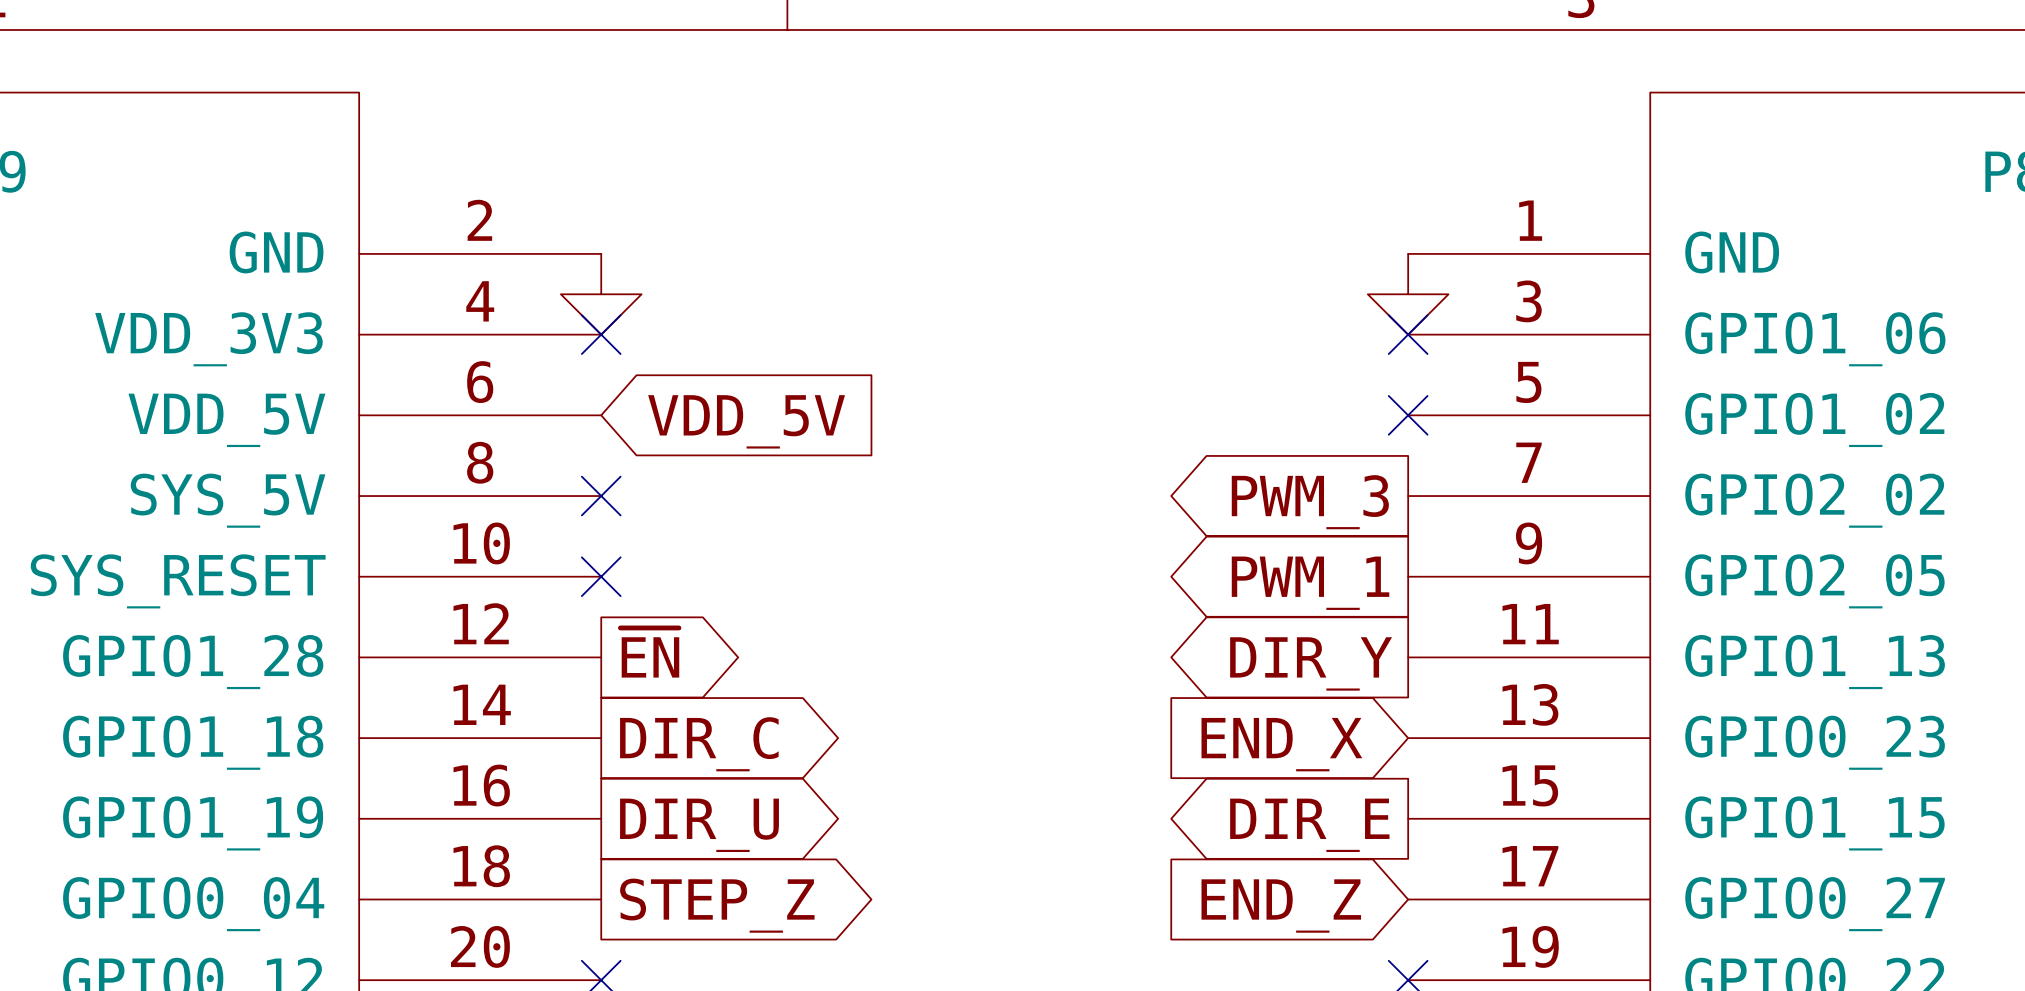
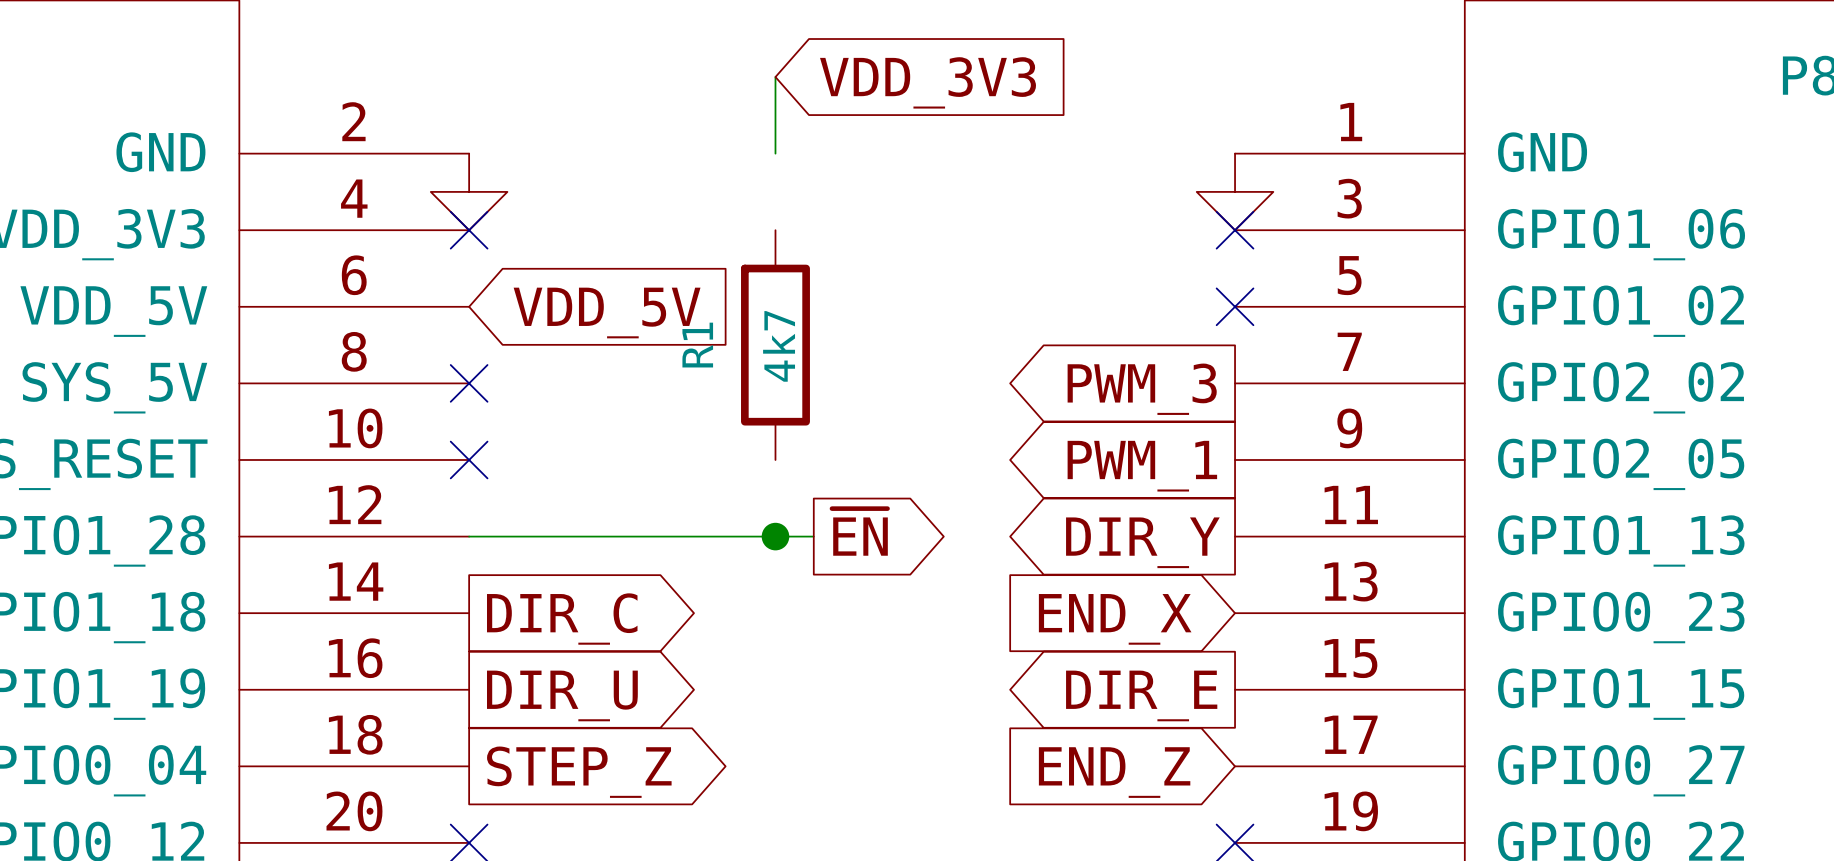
wire: none -> (775, 77) (775, 153)
global label: none -> VDD_3V3 (928, 82)
R1: none -> 4k7 (775, 345)
global label position: ~{EN} (649, 652) -> ~{EN} (859, 532)
wire: none -> (469, 536) (813, 536)
junction: none -> (775, 536)

